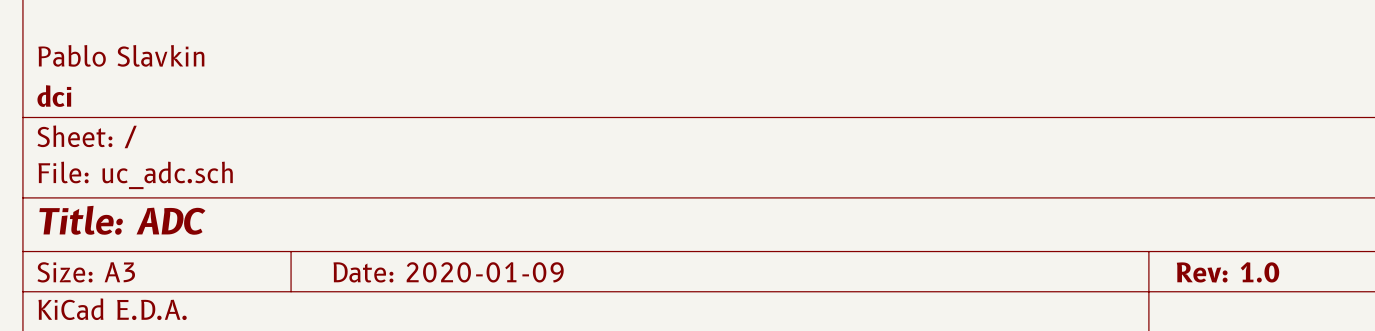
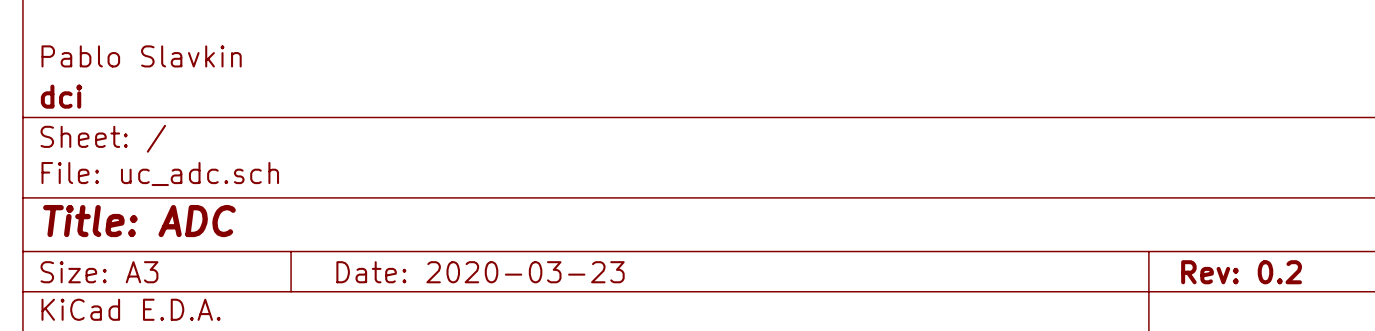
title block: Date: 2020-01-09 (448, 272) -> Date: 2020-03-23 (480, 272)
title block: Rev: 1.0 (1228, 272) -> Rev: 0.2 (1241, 272)

